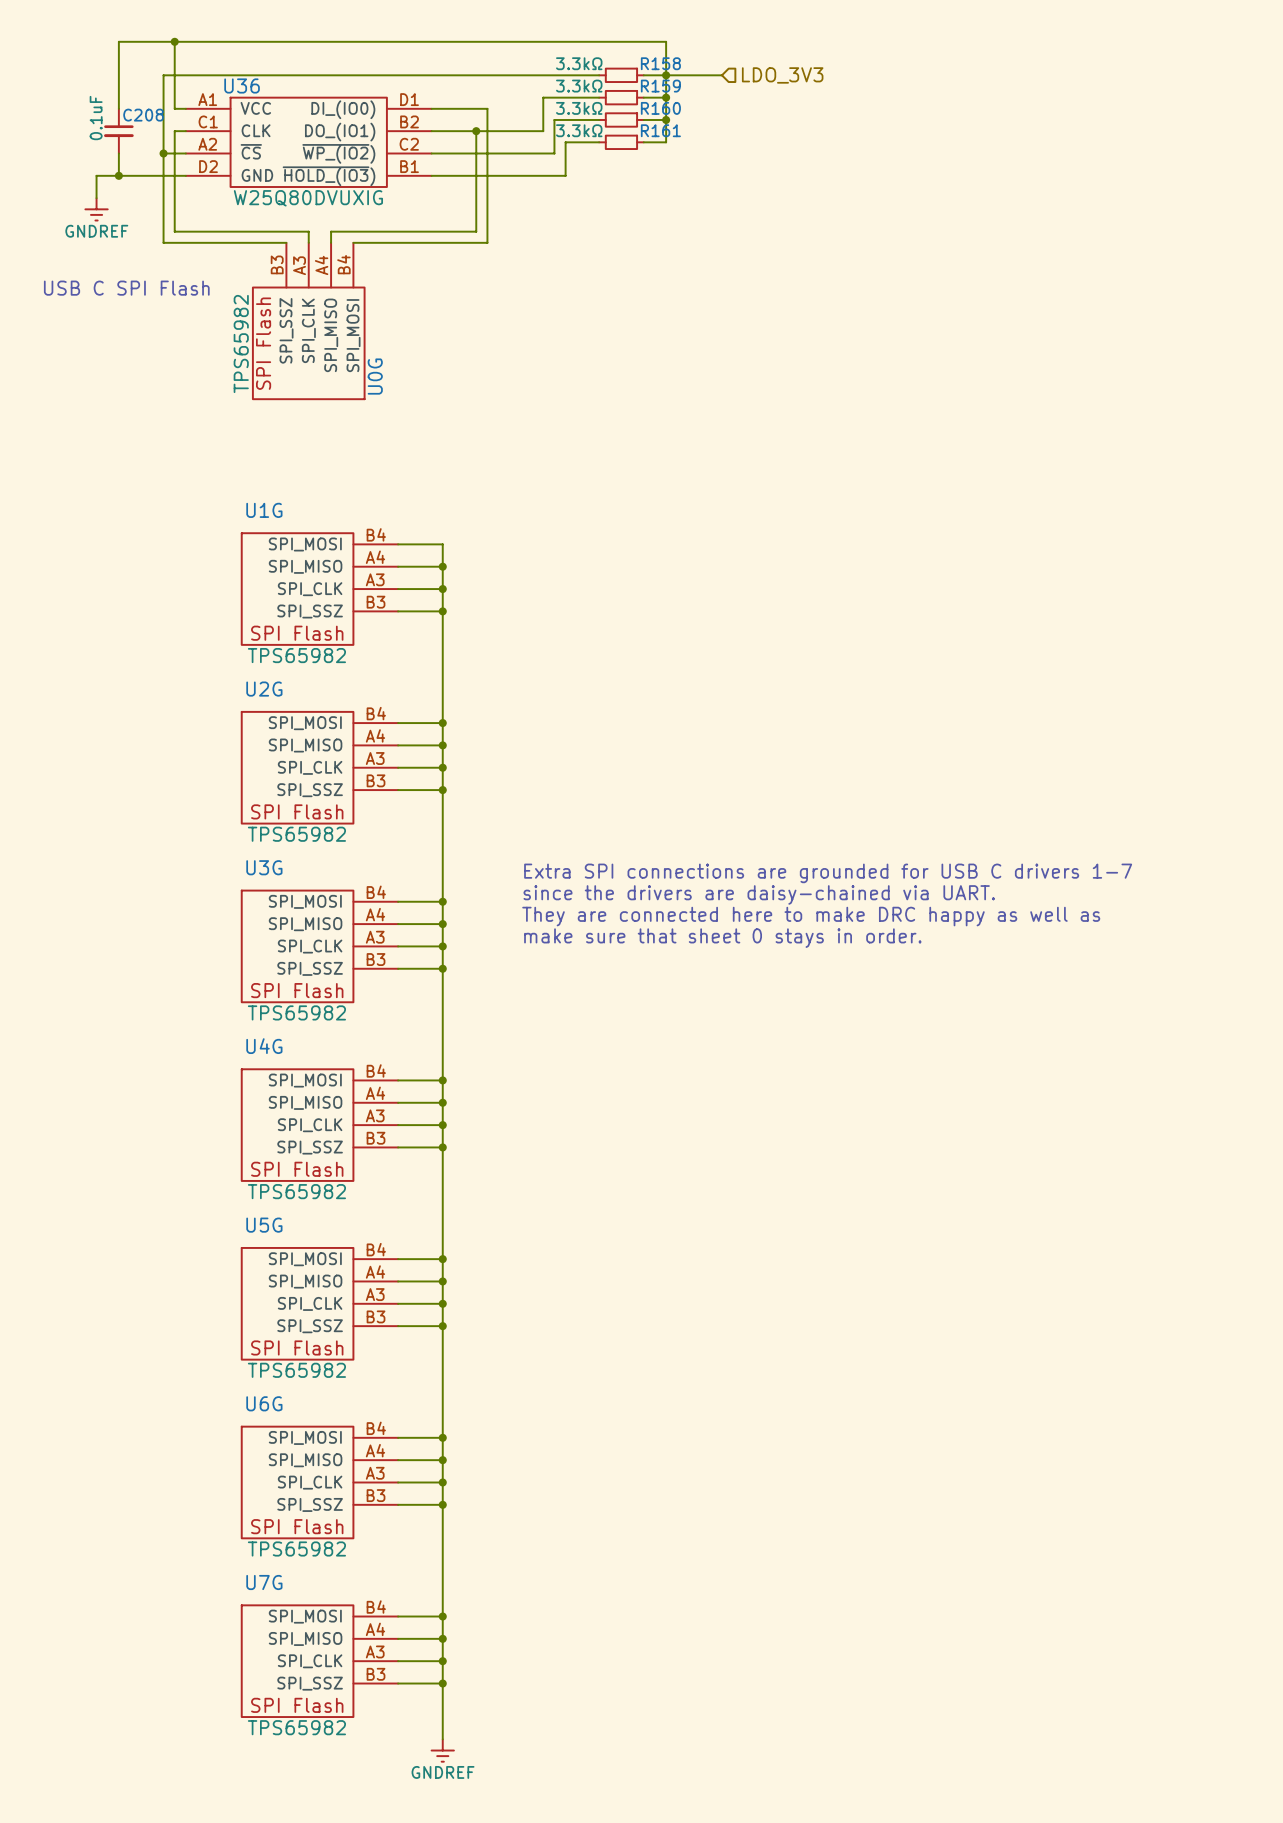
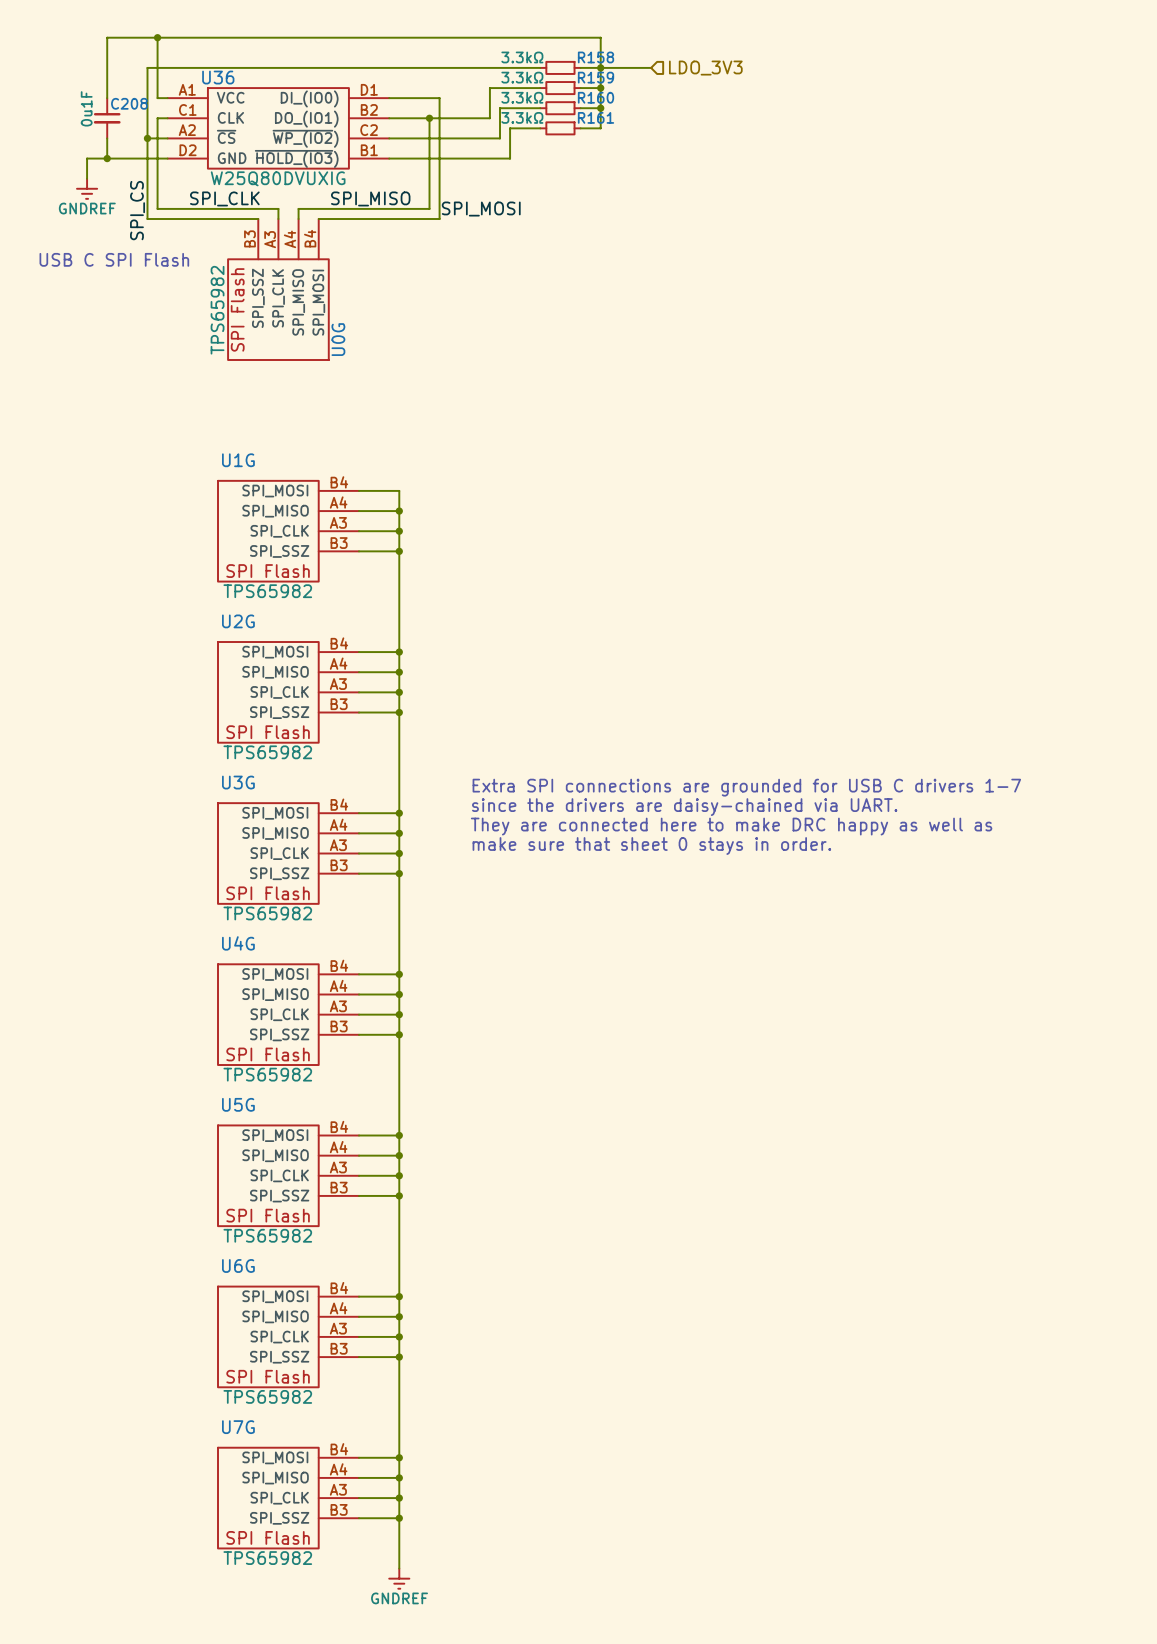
C208 value: 0.1uF (96, 118) -> 0u1F (86, 108)
label: none -> SPI_CLK (224, 198)
label: none -> SPI_MISO (370, 198)
label: none -> SPI_MOSI (481, 209)
label: none -> SPI_CS (137, 210)

